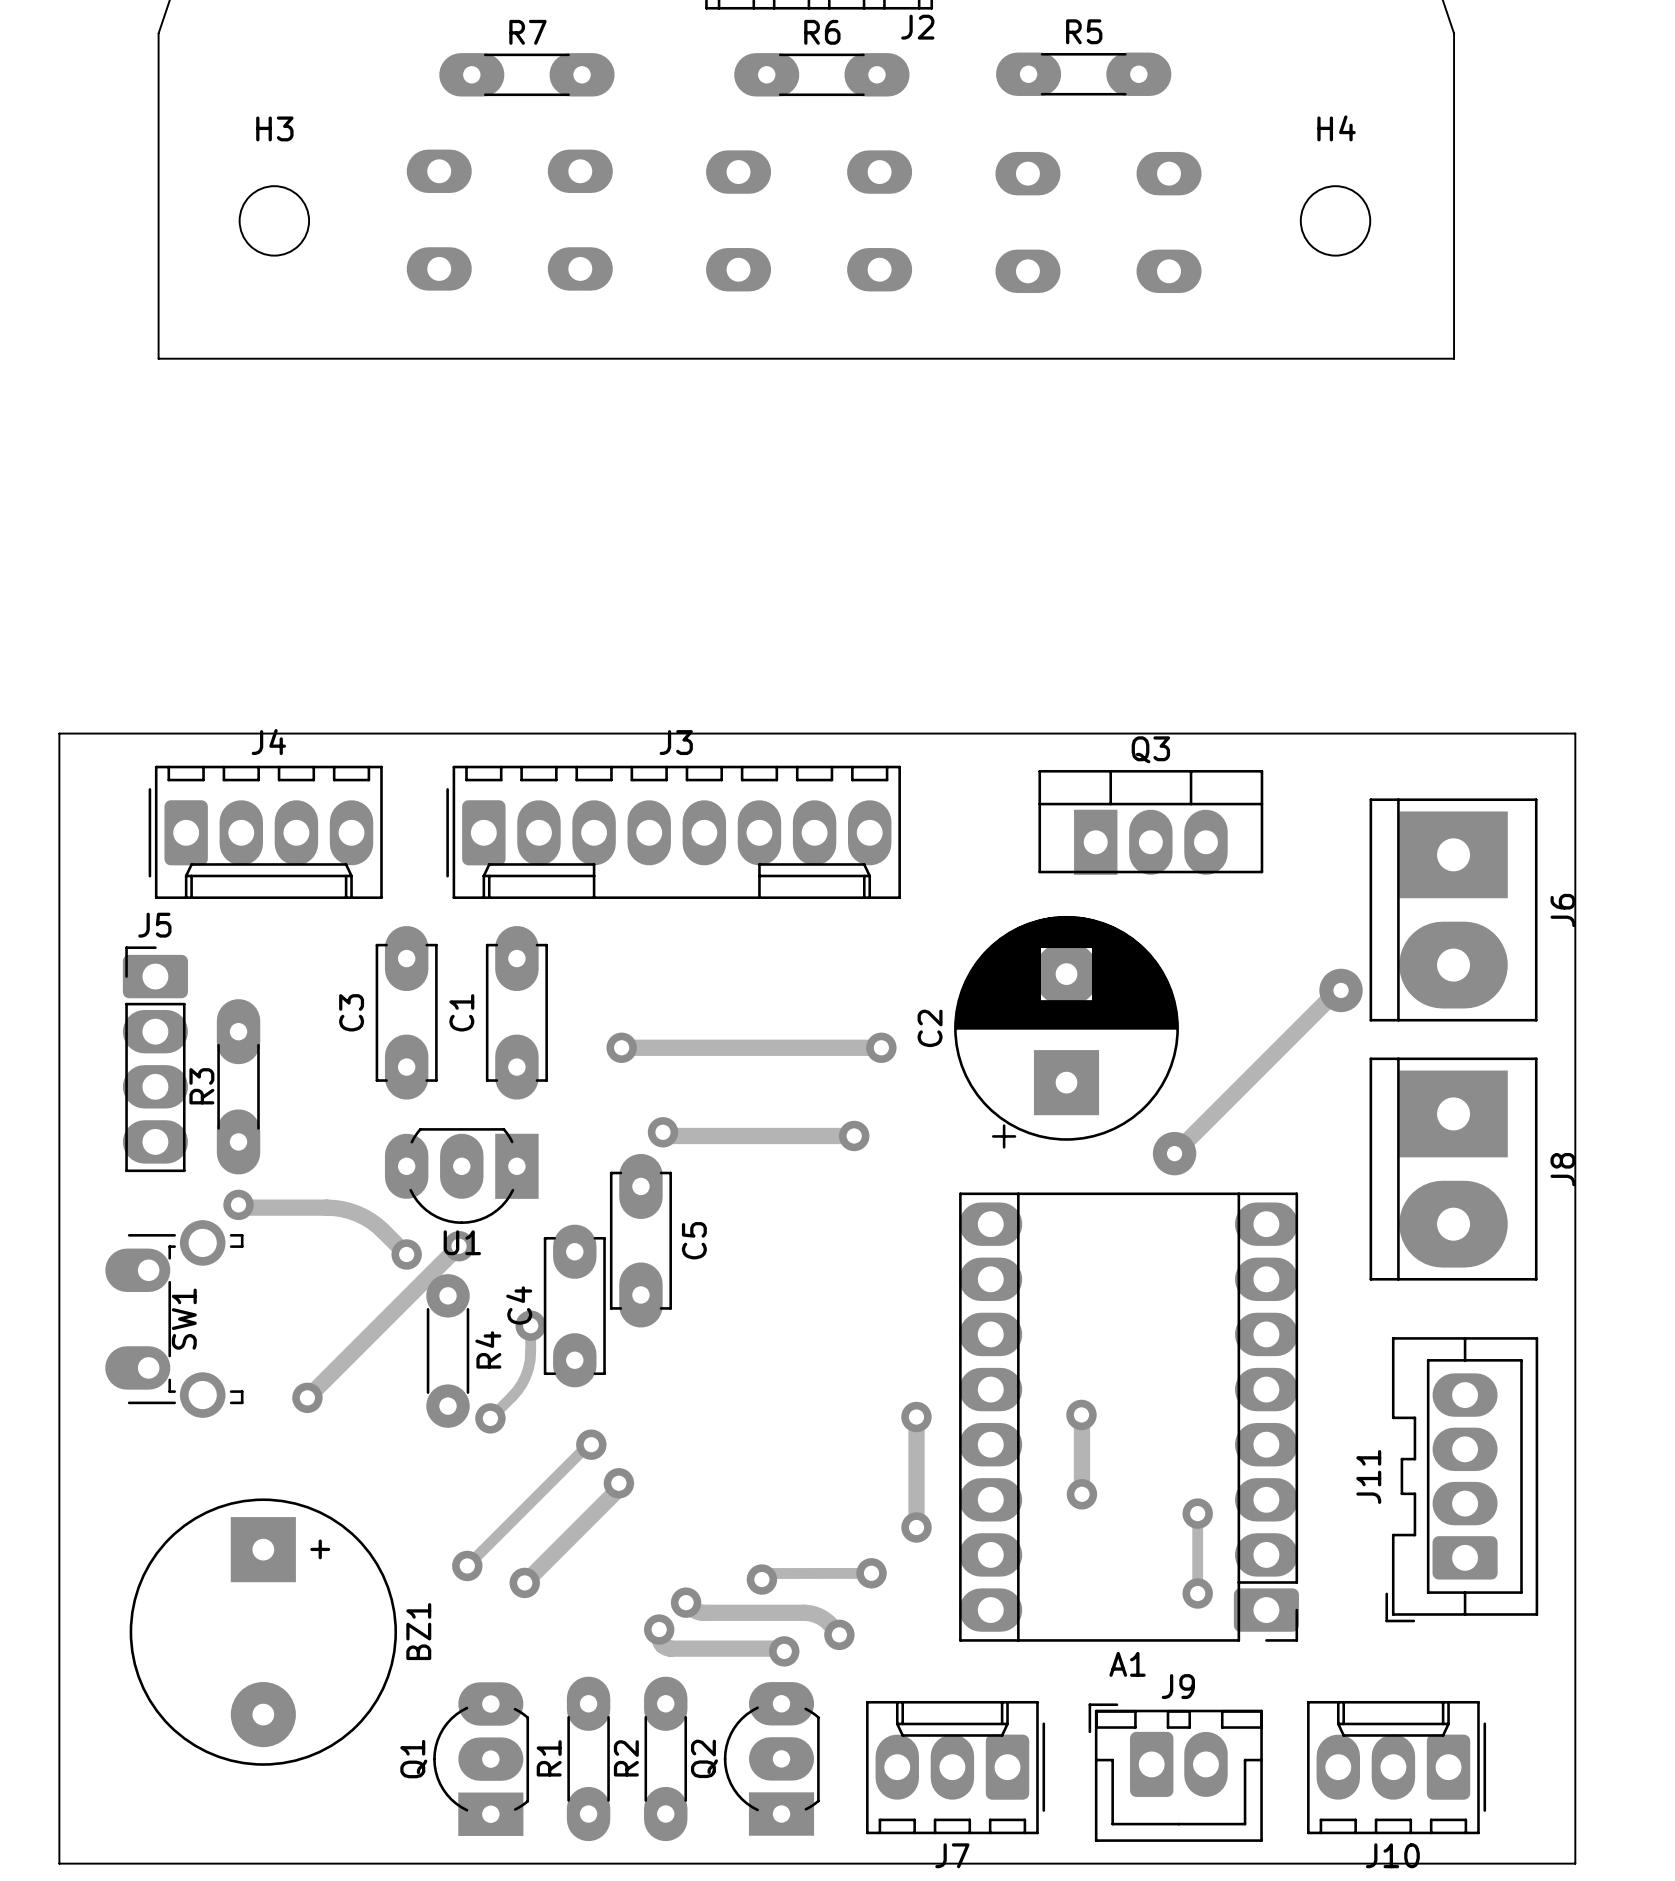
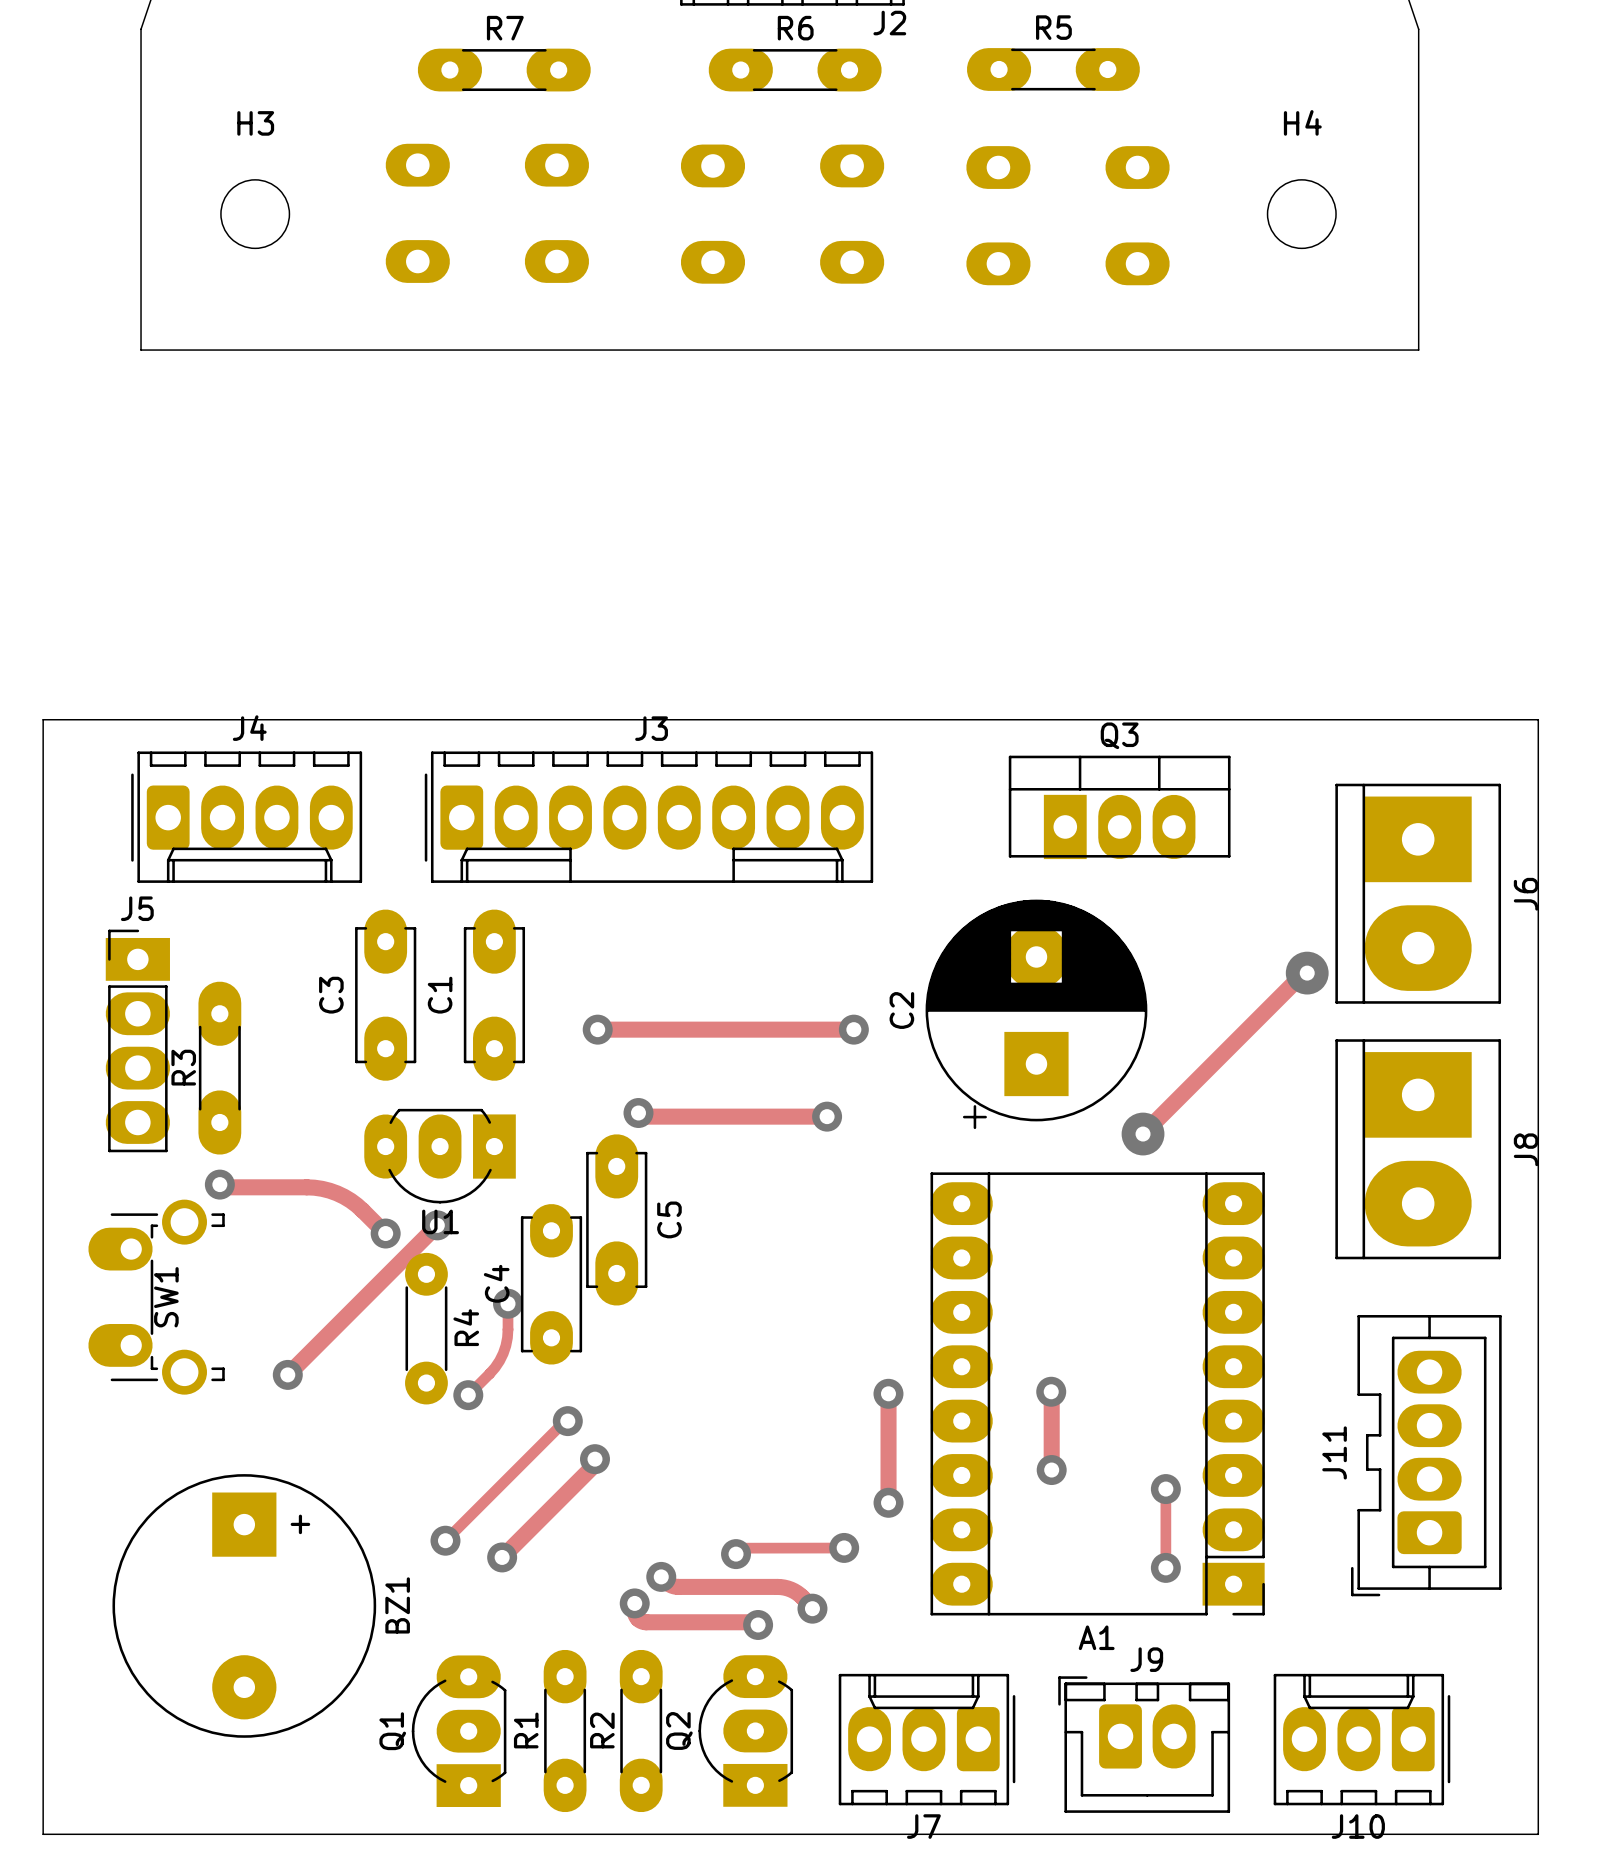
J5 footprint: [122, 946, 188, 1173] -> [105, 929, 170, 1153]
A1 footprint: [959, 1192, 1299, 1642] -> [930, 1172, 1265, 1616]

